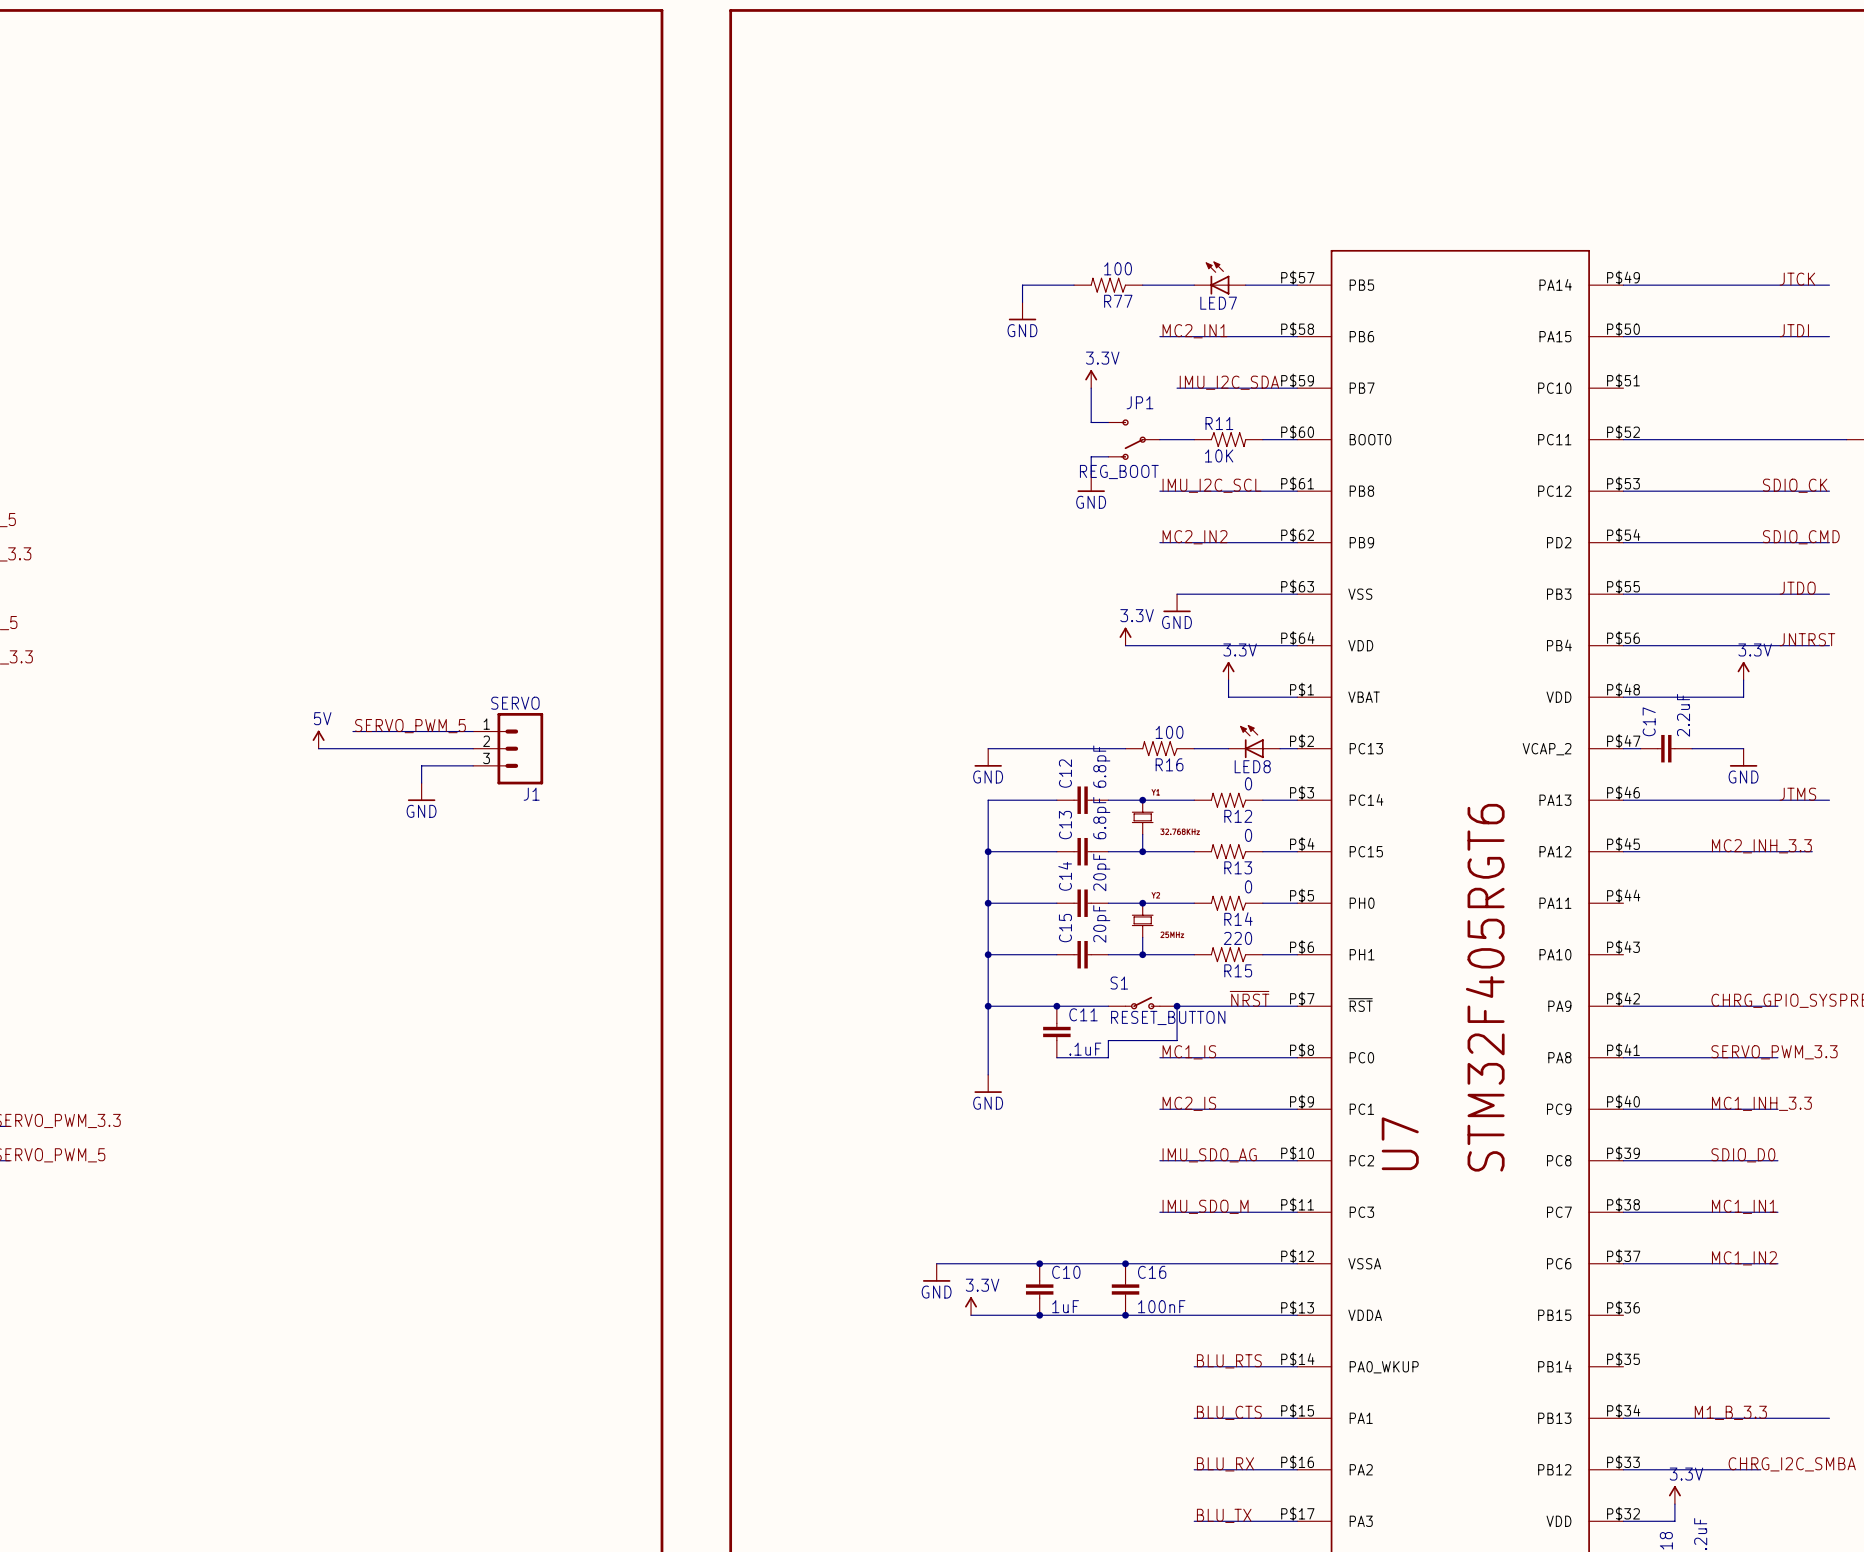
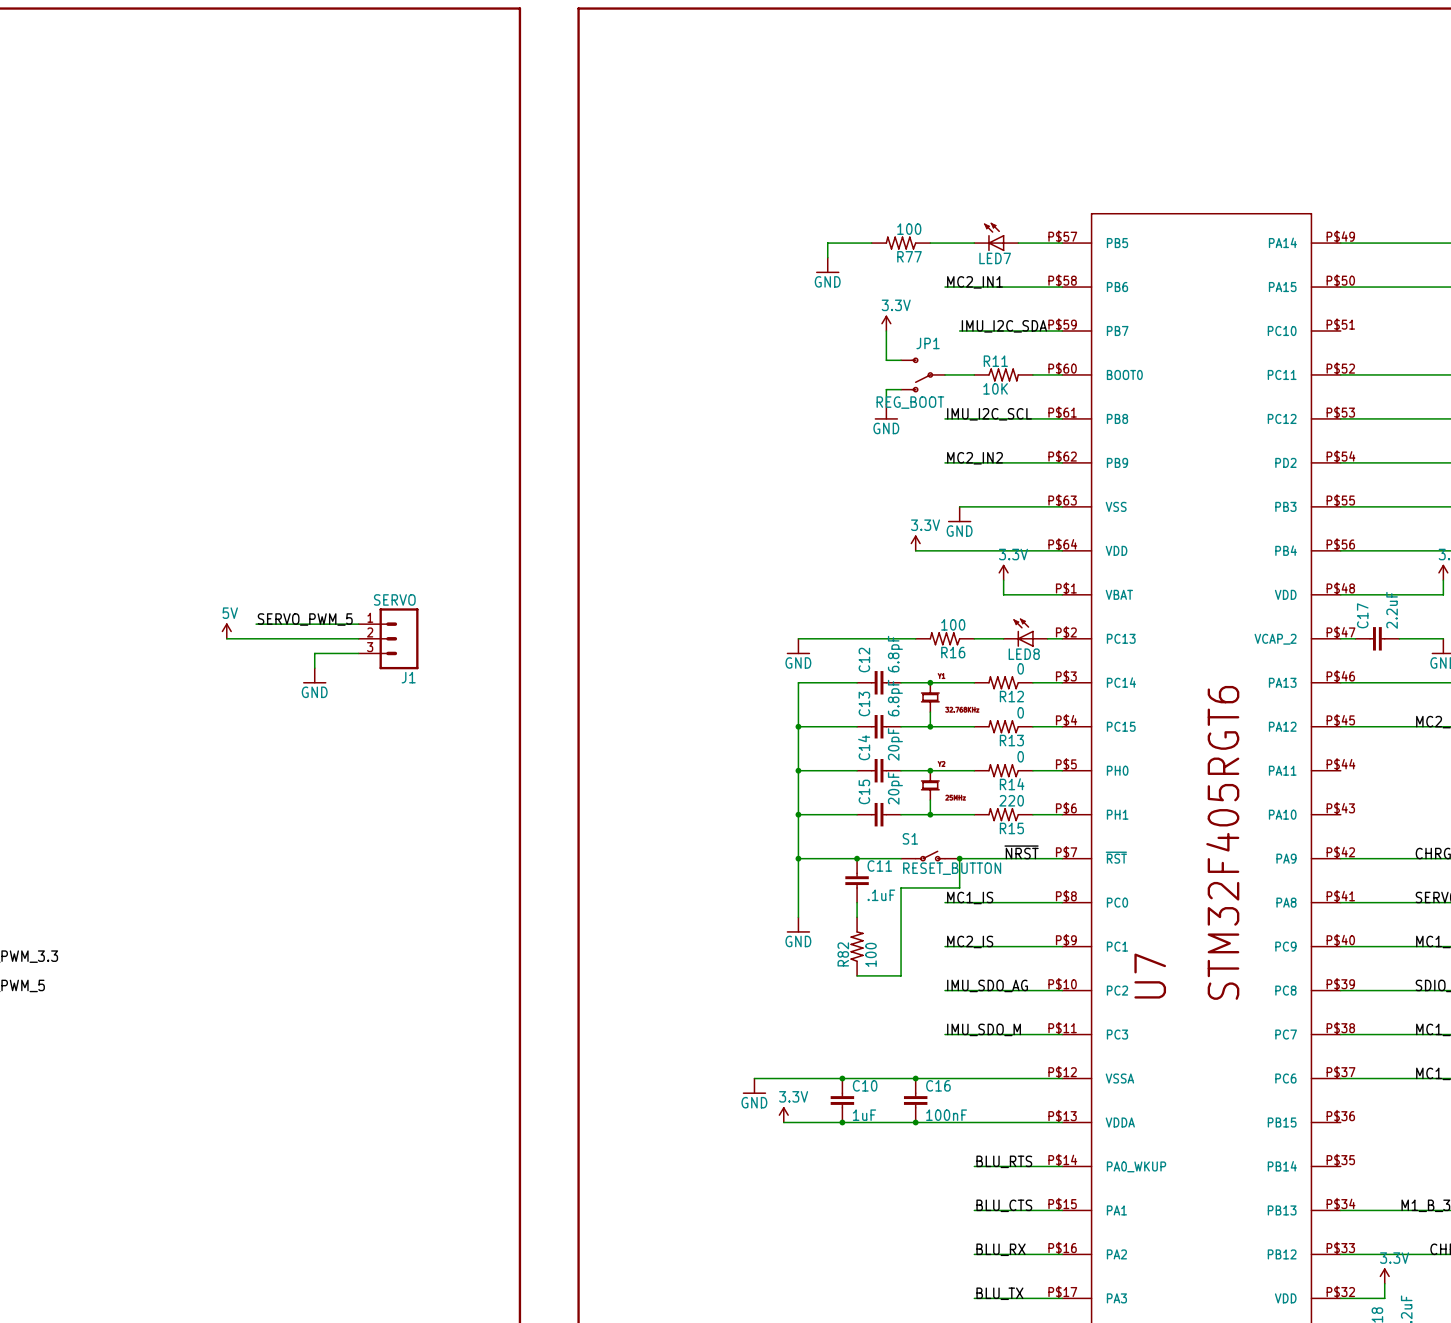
wire: (1056, 1057) (1108, 1057) -> (857, 902) (857, 917)
wire: none -> (901, 902) (901, 975) (857, 975)
R82: none -> 100 (857, 946)

